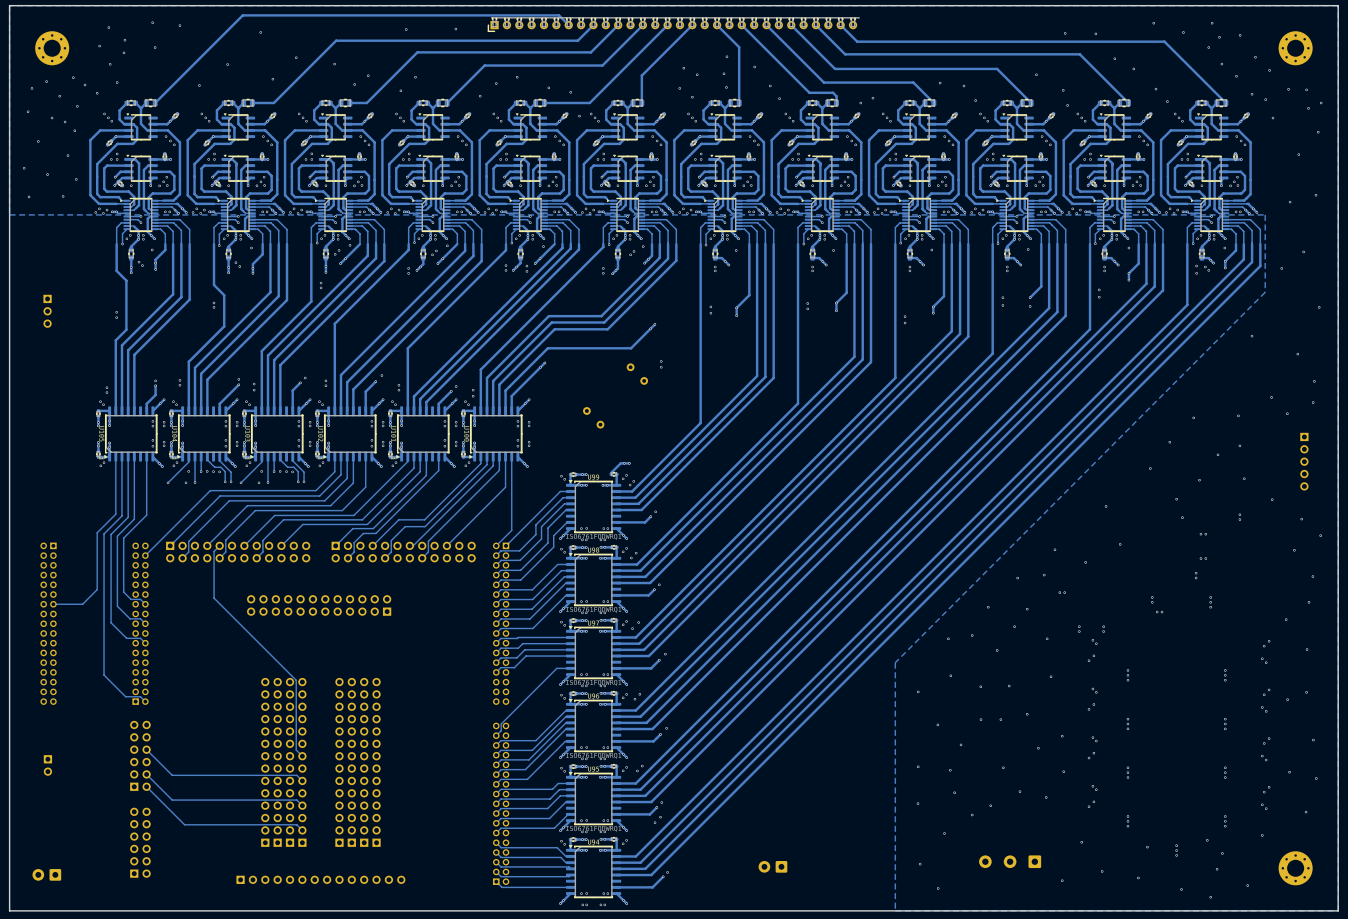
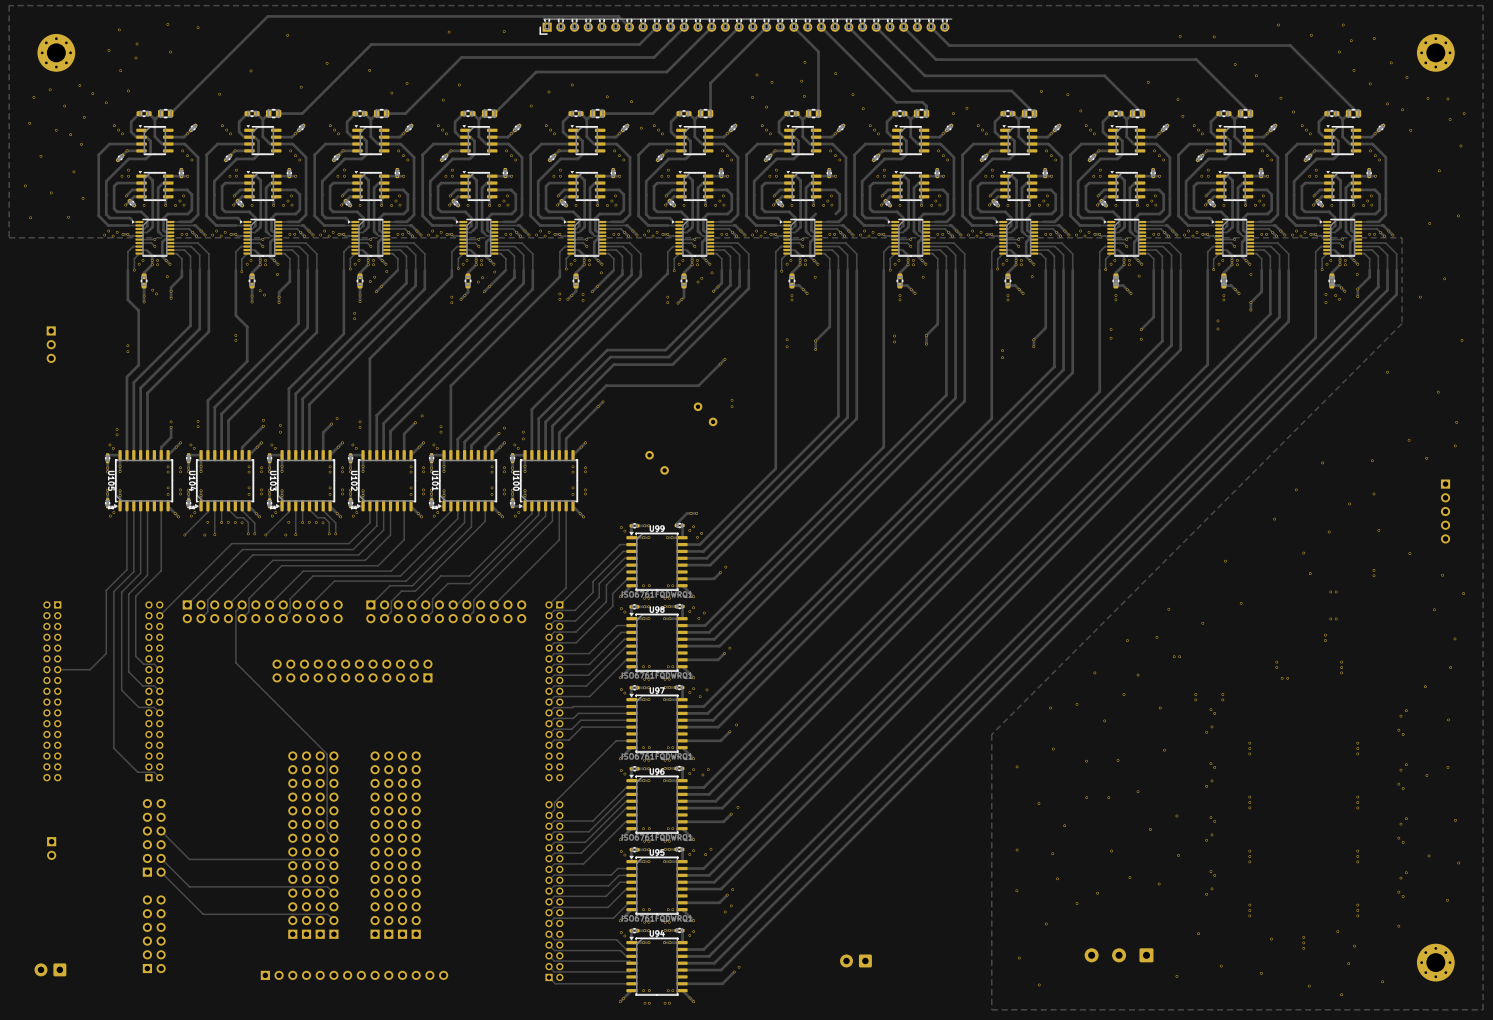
board edge: (1338, 5) (9, 5) (9, 910) (1338, 910) (1338, 5) -> none
track: (754, 193) (736, 193) -> none

